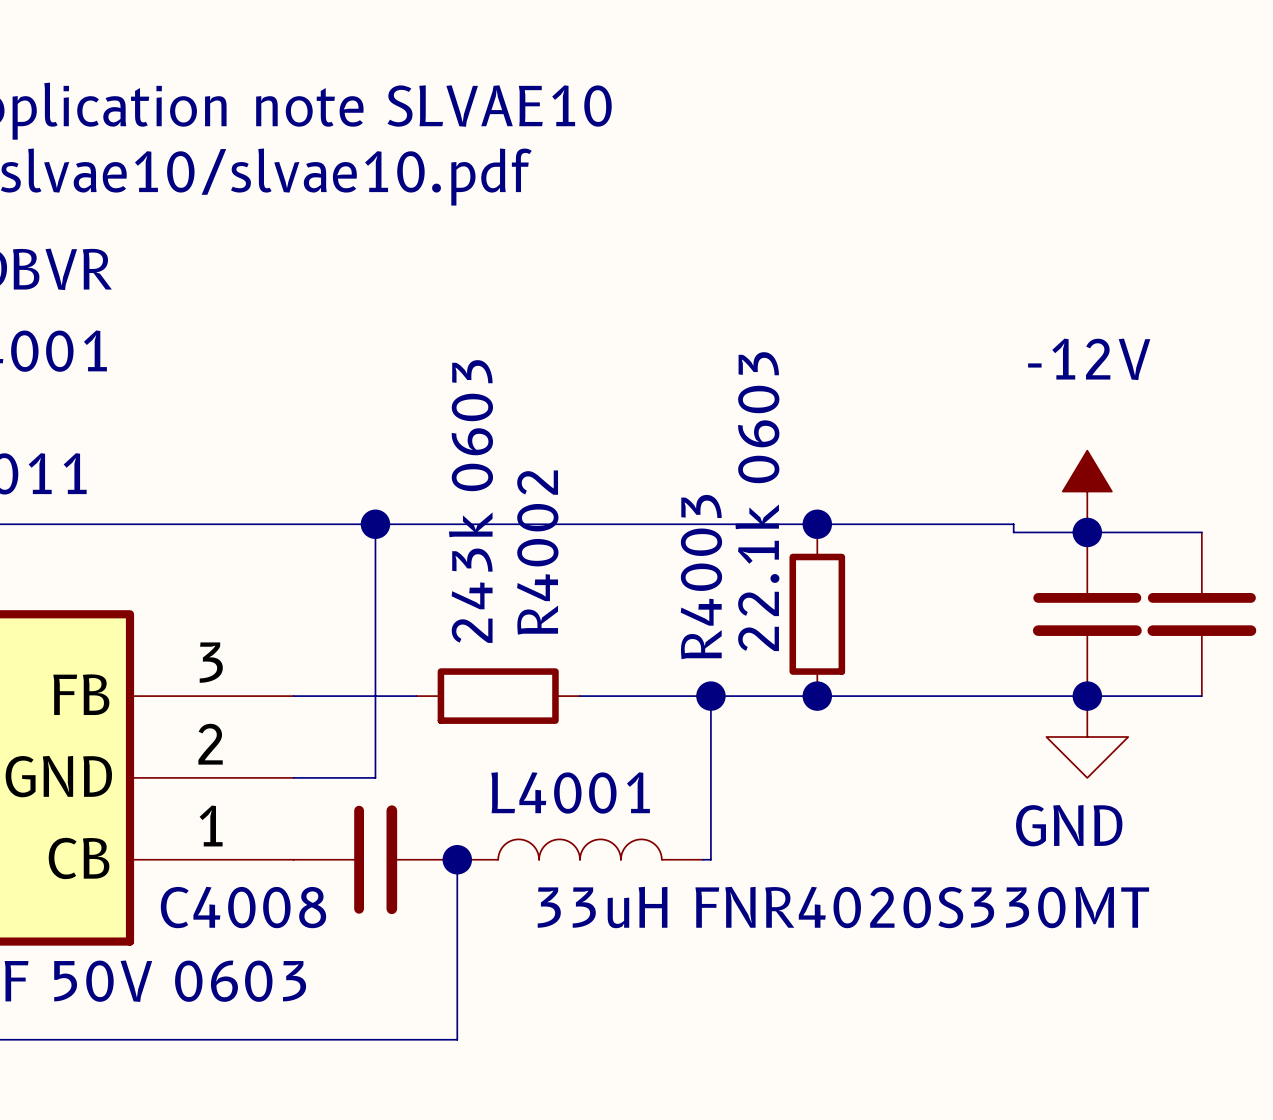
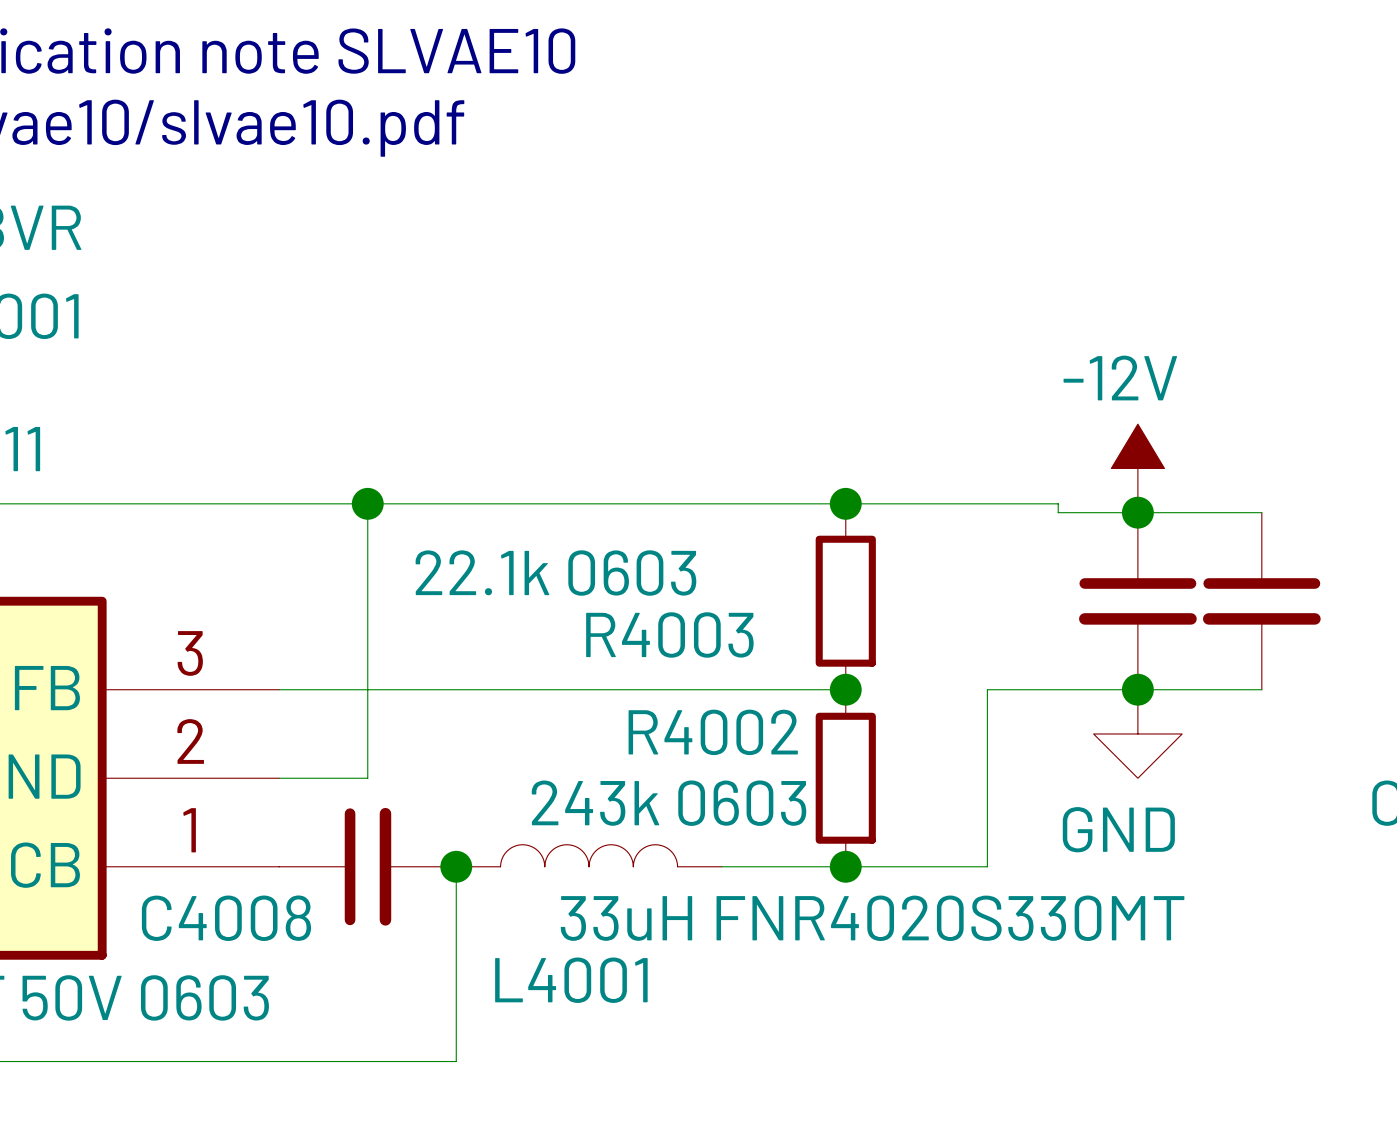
power symbol text position: -12V (1089, 359) -> -12V (1120, 377)
R4002 value position: 243k 0603 (471, 501) -> 243k 0603 (669, 803)
R4003 value rotation: 0° (757, 501) -> 90° clockwise (555, 573)
R4002 name position: R4002 (537, 552) -> R4002 (713, 732)
R4003 name rotation: 0° (701, 577) -> 90° clockwise (669, 634)
wire: none -> (412, 689) (589, 689)
R4002 rotation: 0° (498, 696) -> 90° clockwise (845, 778)
R4002 position: (498, 696) -> (845, 778)
wire: (710, 696) (710, 859) -> none
junction: (710, 696) -> none
wire: (817, 696) (948, 696) -> (730, 866) (987, 866) (987, 689)
L4001 name position: L4001 (570, 792) -> L4001 (571, 980)
junction: none -> (845, 866)

